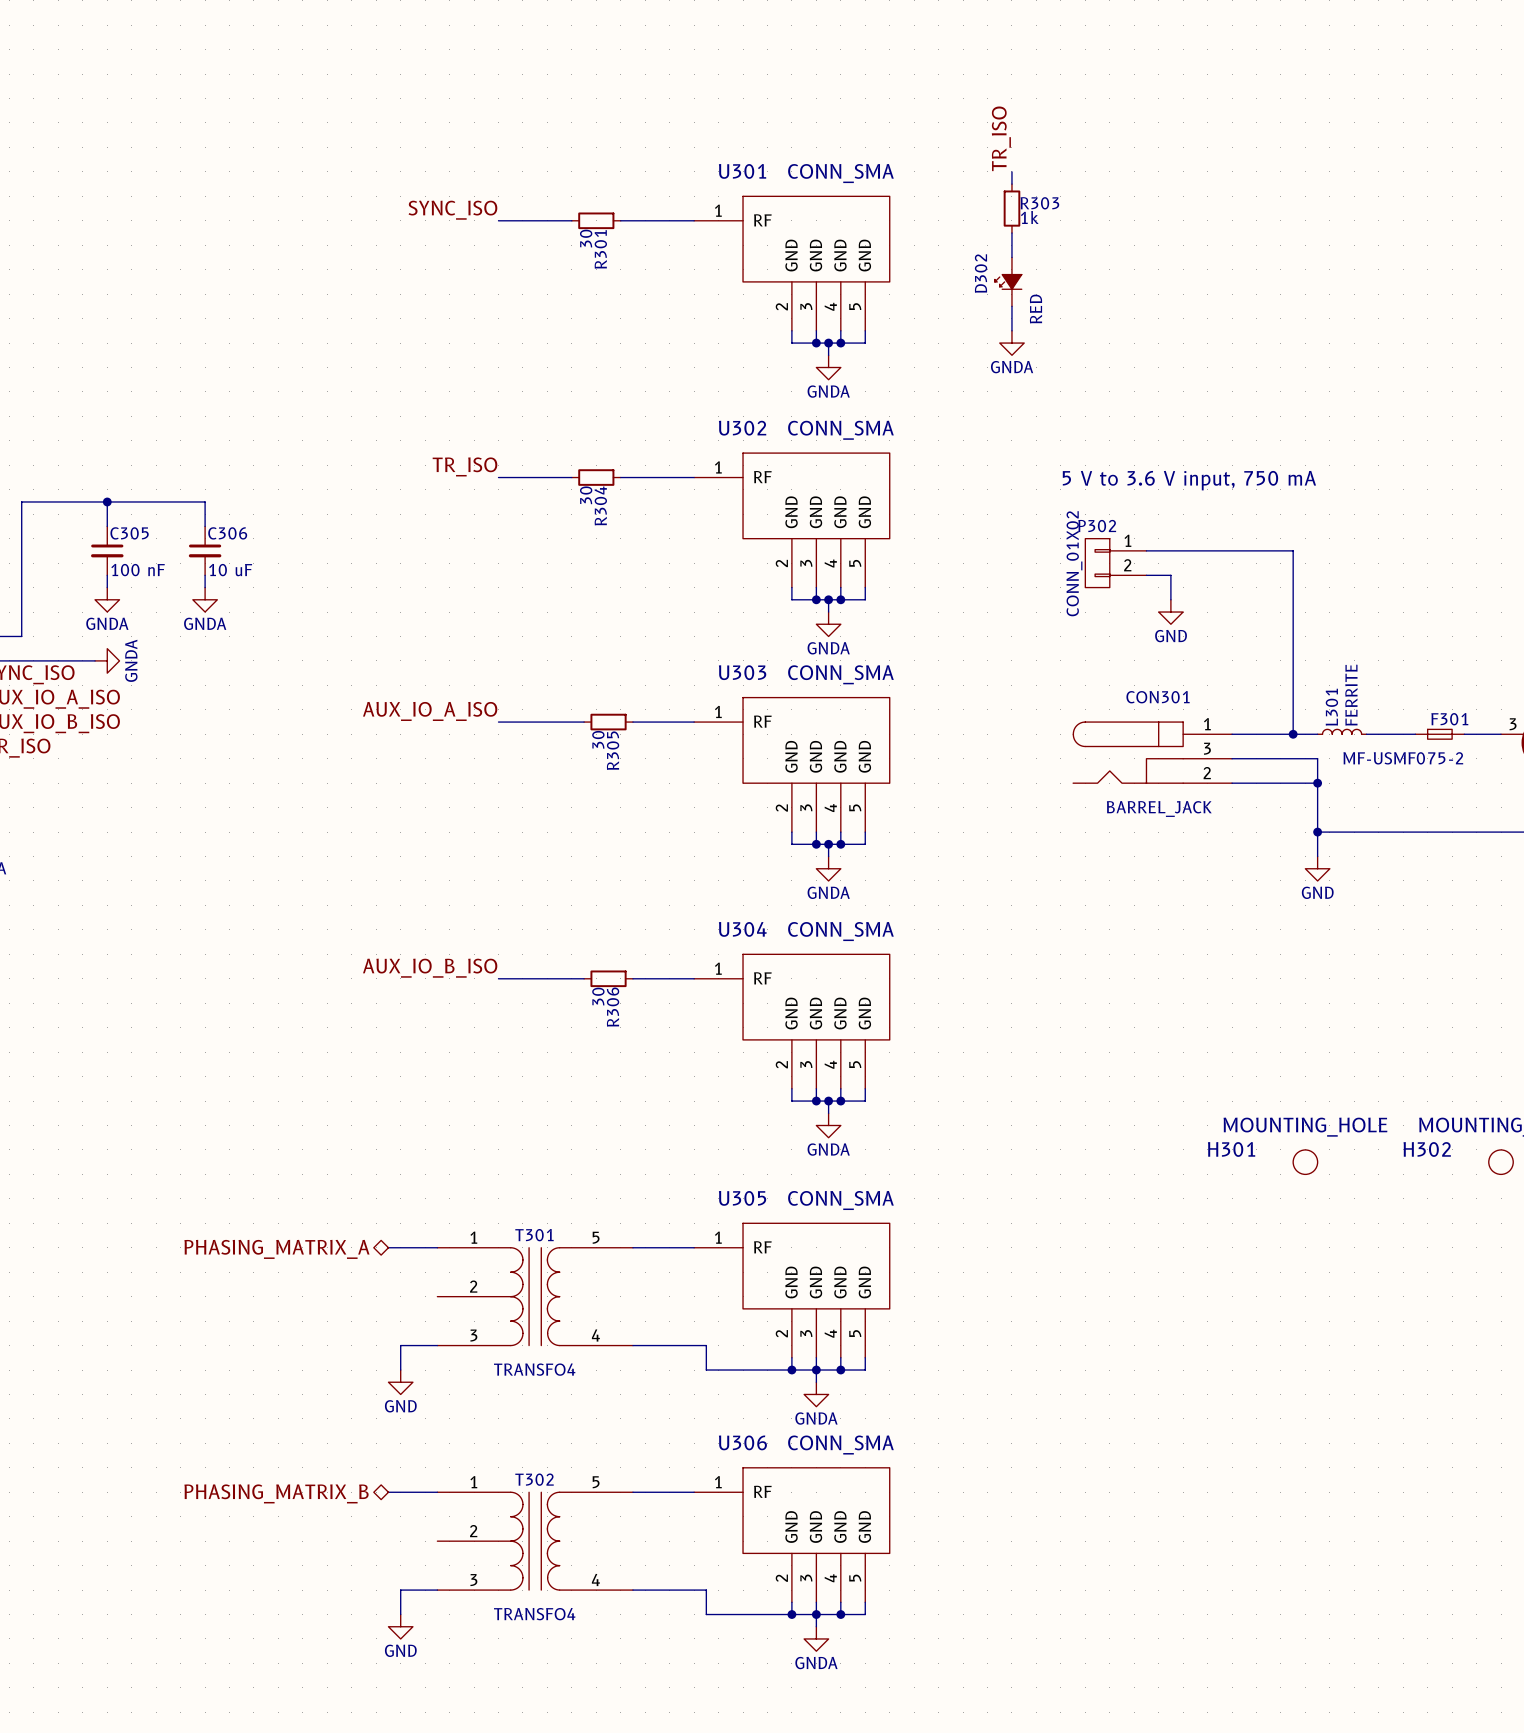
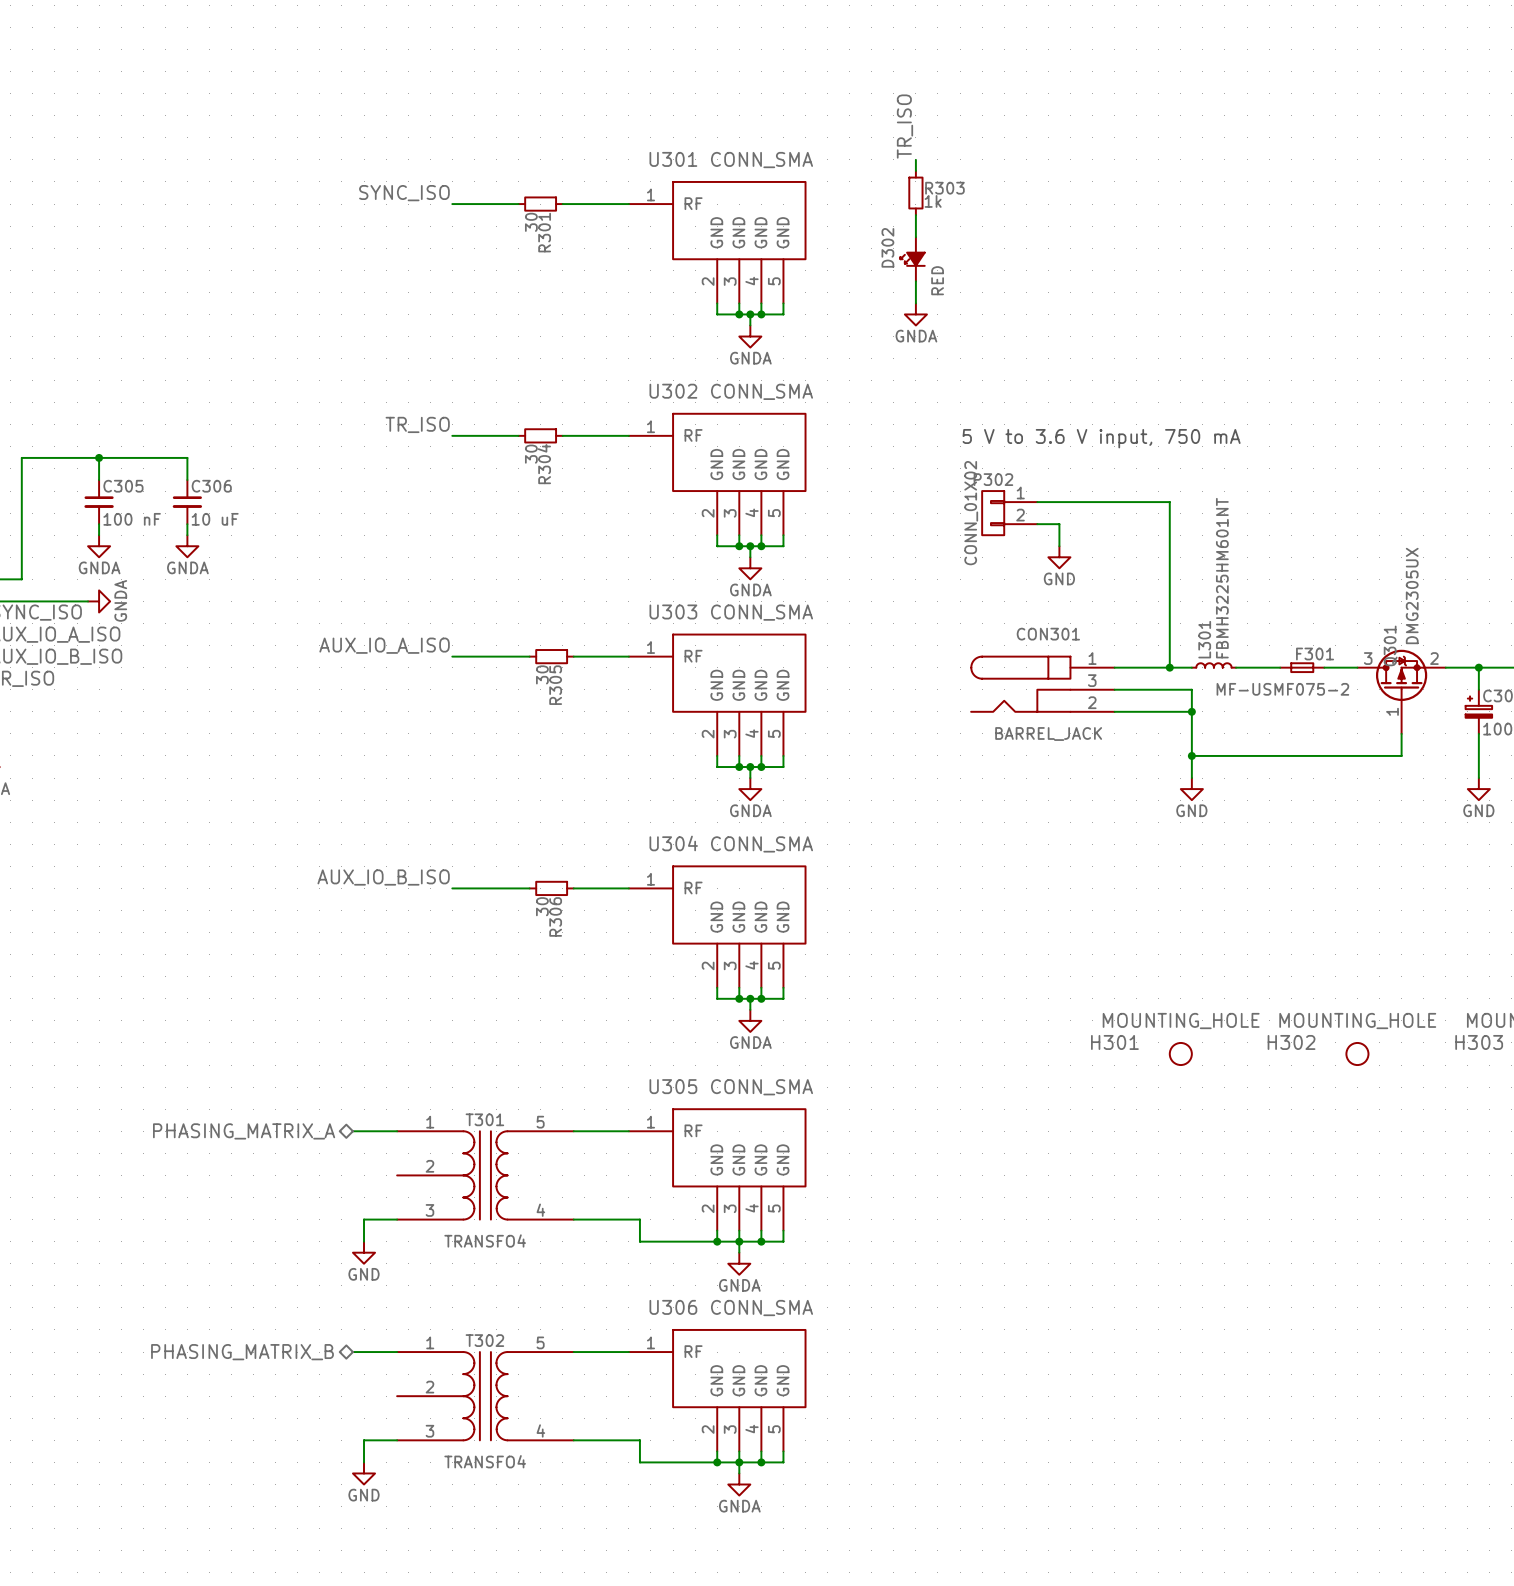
L301 value: FERRITE (1351, 695) -> FBMH3225HM601NT (1222, 578)

